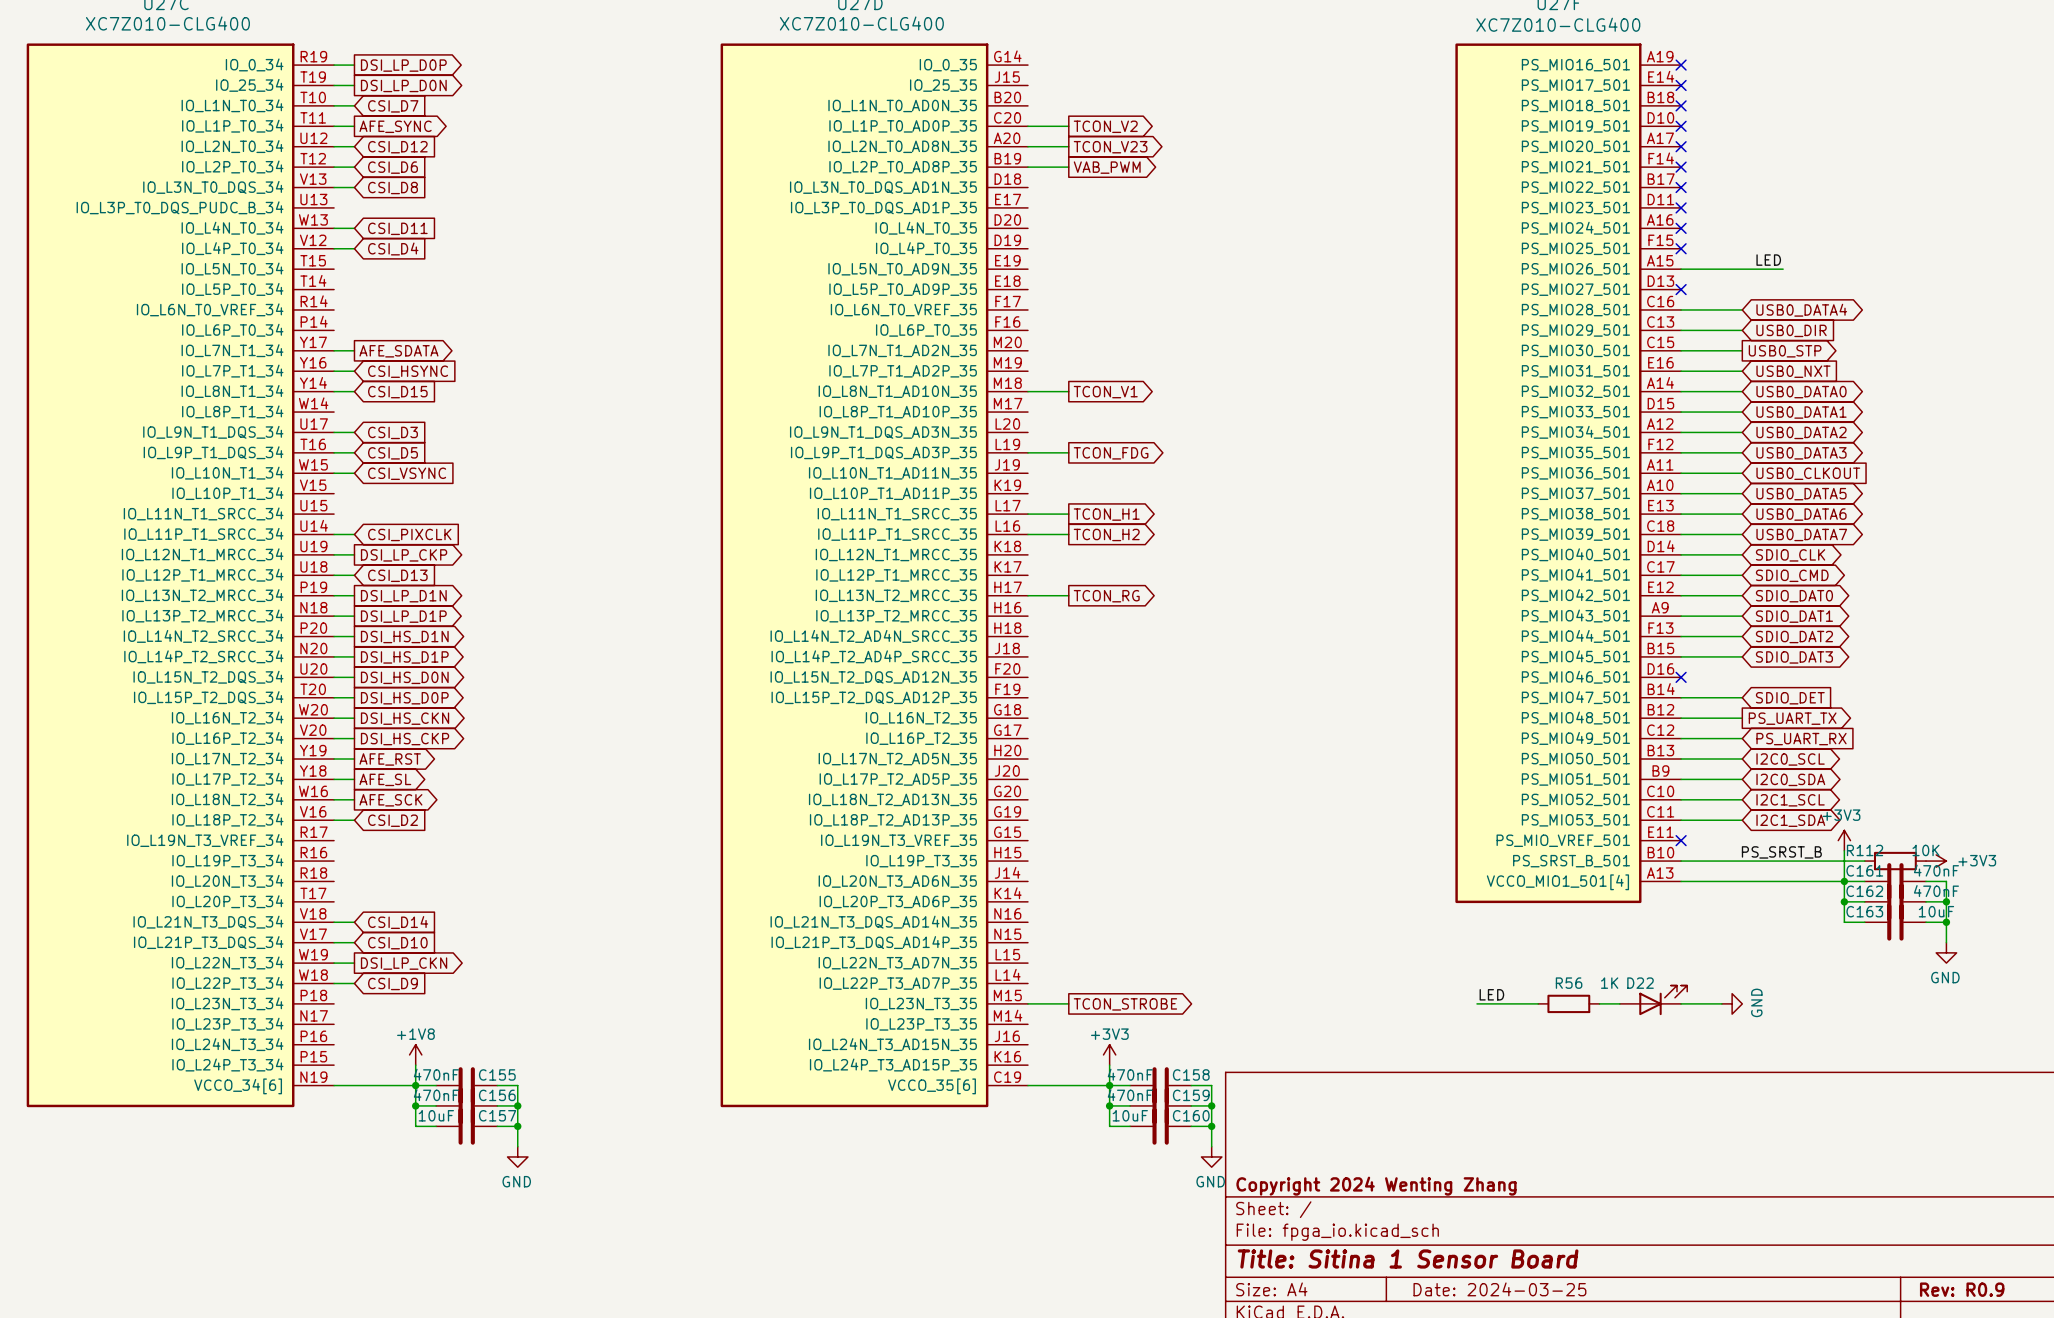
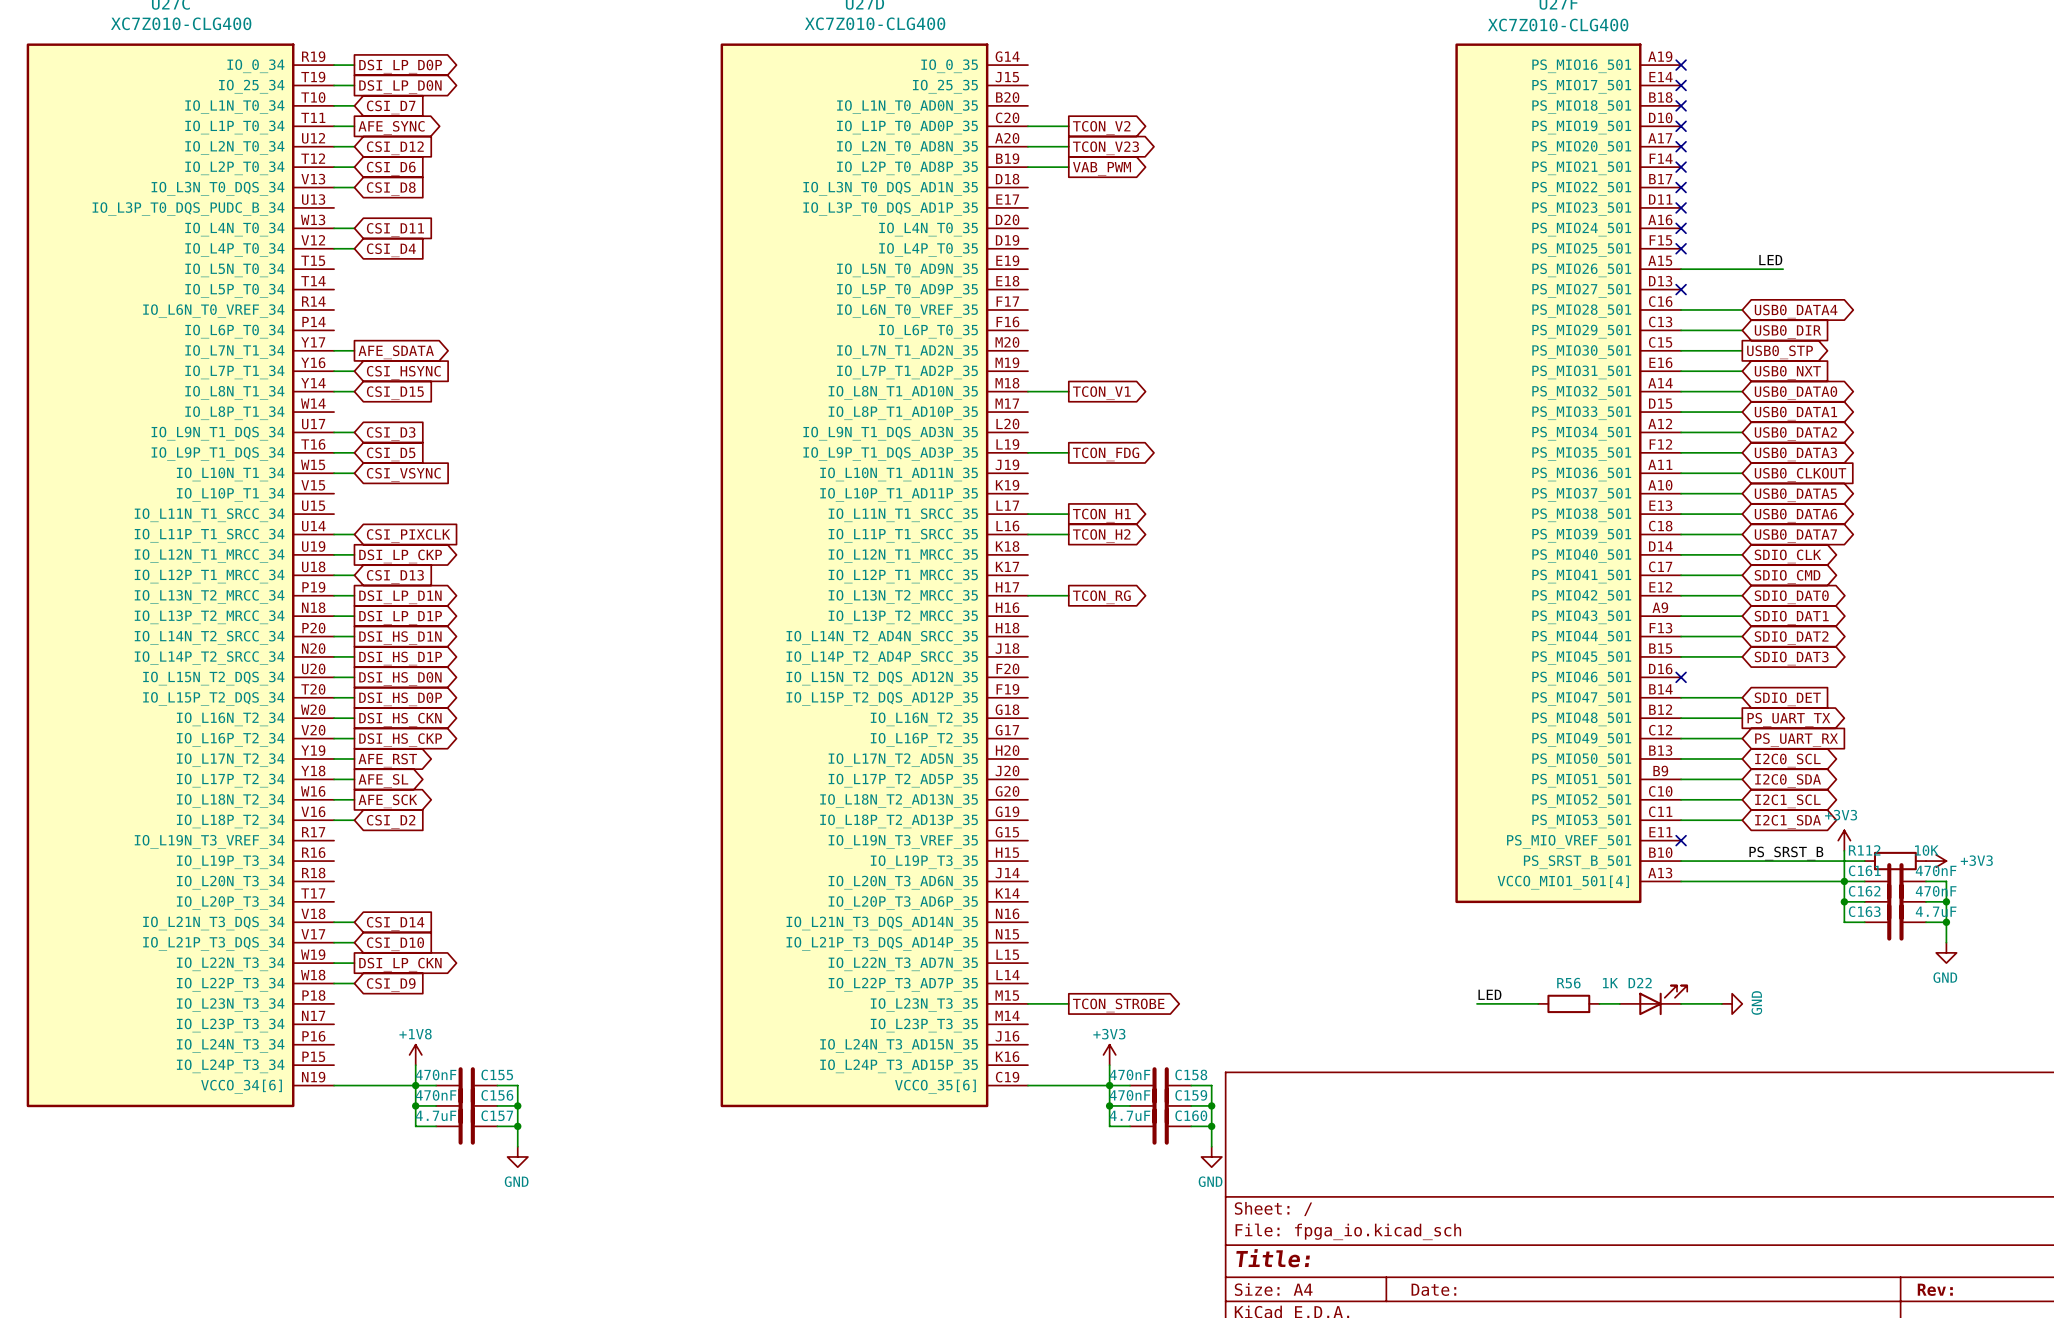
C163 value: 10uF (1936, 911) -> 4.7uF (1936, 911)
C157 value: 10uF (436, 1115) -> 4.7uF (436, 1115)
C160 value: 10uF (1130, 1115) -> 4.7uF (1129, 1115)
title block: Copyright 2024 Wenting Zhang (1376, 1186) -> none
title block: Title: Sitina 1 Sensor Board (1408, 1258) -> Title: (1273, 1258)
title block: Date: 2024-03-25 (1499, 1289) -> Date: (1433, 1289)
title block: Rev: R0.9 (1962, 1289) -> Rev: (1935, 1289)

